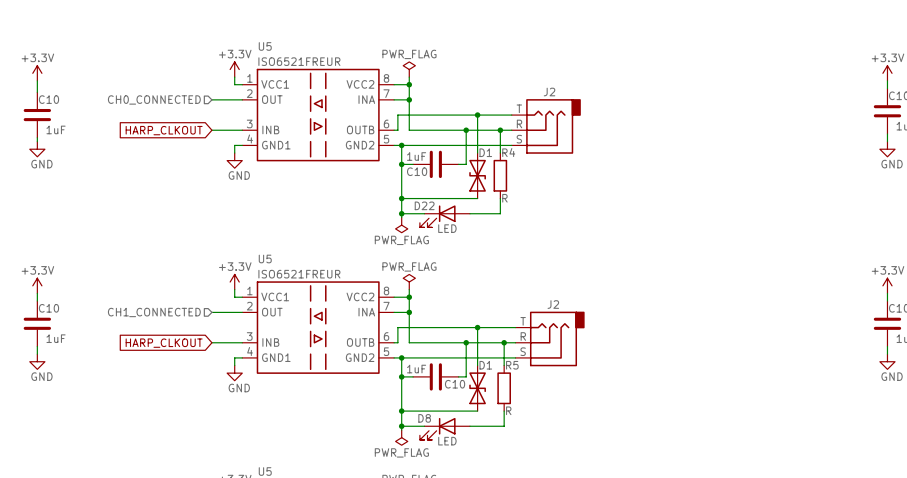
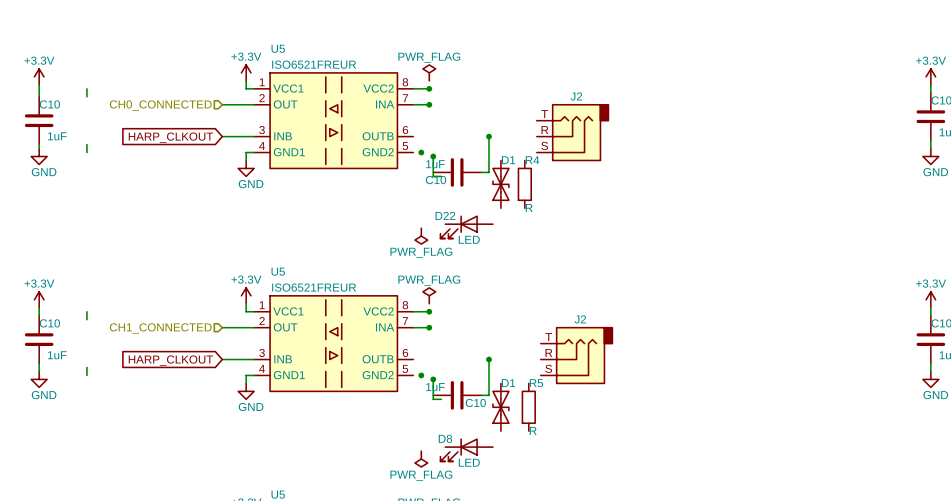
wire: (409, 77) (409, 130) (511, 130) -> none
wire: none -> (86, 88) (86, 96)
wire: (477, 115) (477, 153) -> none
junction: (477, 115) -> none
wire: (511, 115) (397, 115) (397, 130) (394, 130) -> none
wire: (500, 130) (500, 153) -> none
junction: (500, 130) -> none
wire: none -> (86, 144) (86, 152)
wire: (394, 145) (511, 145) -> none
wire: (401, 145) (401, 217) -> none
wire: none -> (433, 156) (433, 176) (441, 176)
wire: (401, 164) (413, 164) -> none
junction position: (401, 164) -> (433, 156)
wire: (401, 198) (477, 198) -> none
junction: (401, 198) -> none
wire: (500, 198) (500, 213) (470, 213) -> none
wire: (401, 213) (424, 213) -> none
junction: (401, 213) -> none
wire: (409, 289) (409, 342) (515, 342) -> none
wire: none -> (86, 311) (86, 319)
wire: (477, 327) (477, 365) -> none
junction: (477, 327) -> none
wire: (515, 327) (397, 327) (397, 342) (394, 342) -> none
wire: (504, 342) (504, 365) -> none
junction: (504, 342) -> none
wire: none -> (86, 367) (86, 375)
wire: (394, 357) (515, 357) -> none
wire: (401, 357) (401, 430) -> none
wire: none -> (433, 379) (433, 399) (441, 399)
wire: (401, 376) (413, 376) -> none
junction position: (401, 376) -> (433, 379)
wire: (401, 411) (477, 411) -> none
junction: (401, 411) -> none
wire: (504, 411) (504, 426) (470, 426) -> none
wire: (401, 426) (424, 426) -> none
junction: (401, 426) -> none

